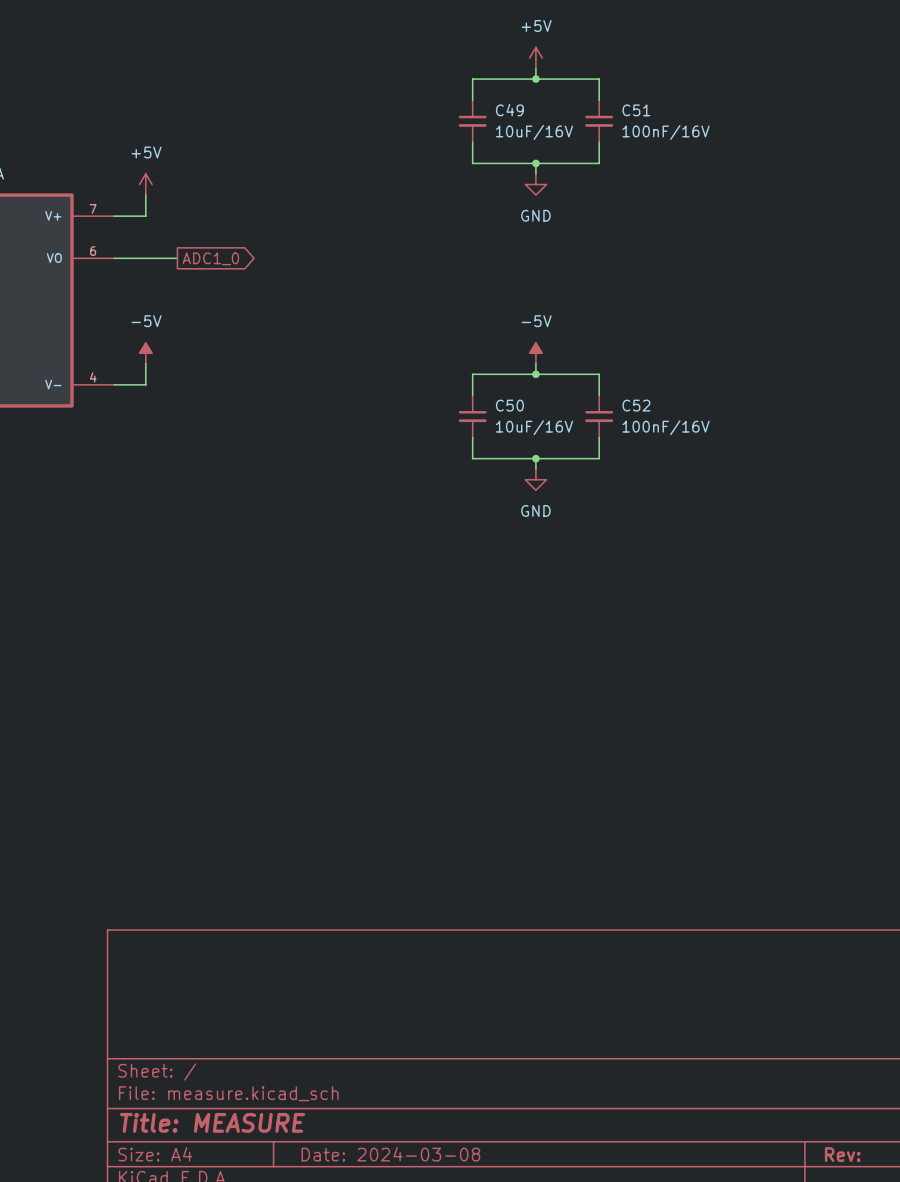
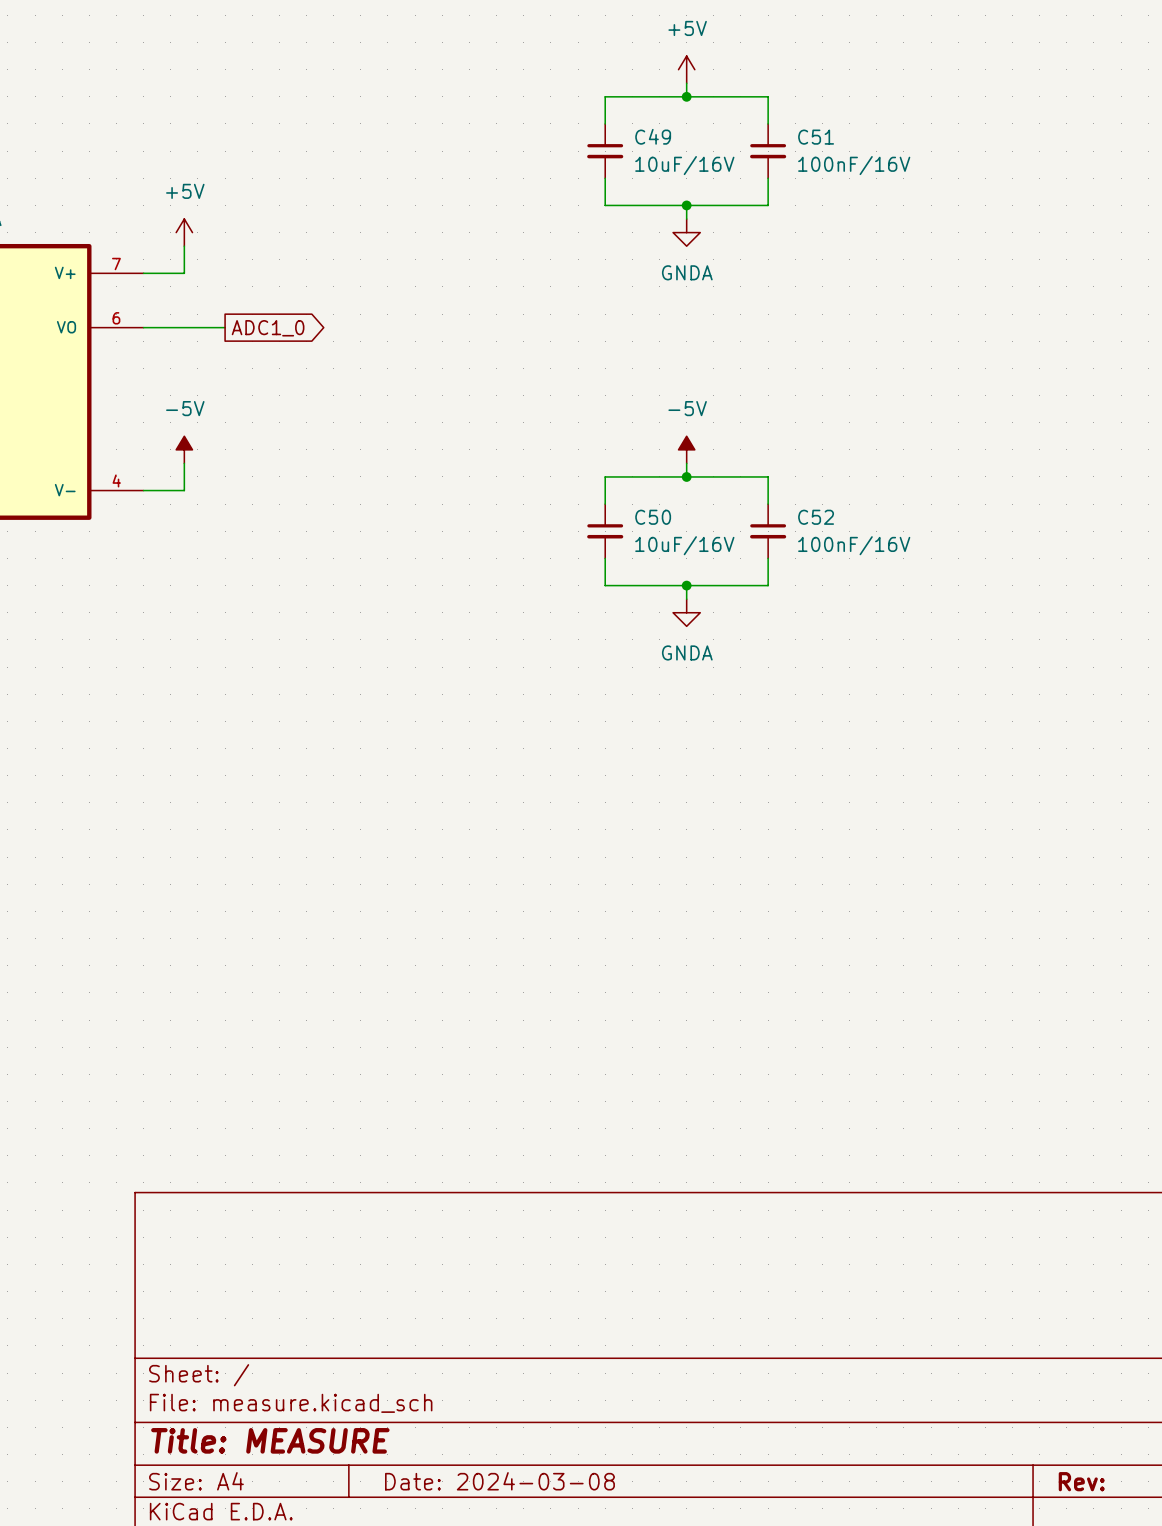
power symbol: GND (535, 184) -> GNDA (686, 232)
power symbol: GND (535, 479) -> GNDA (686, 612)

